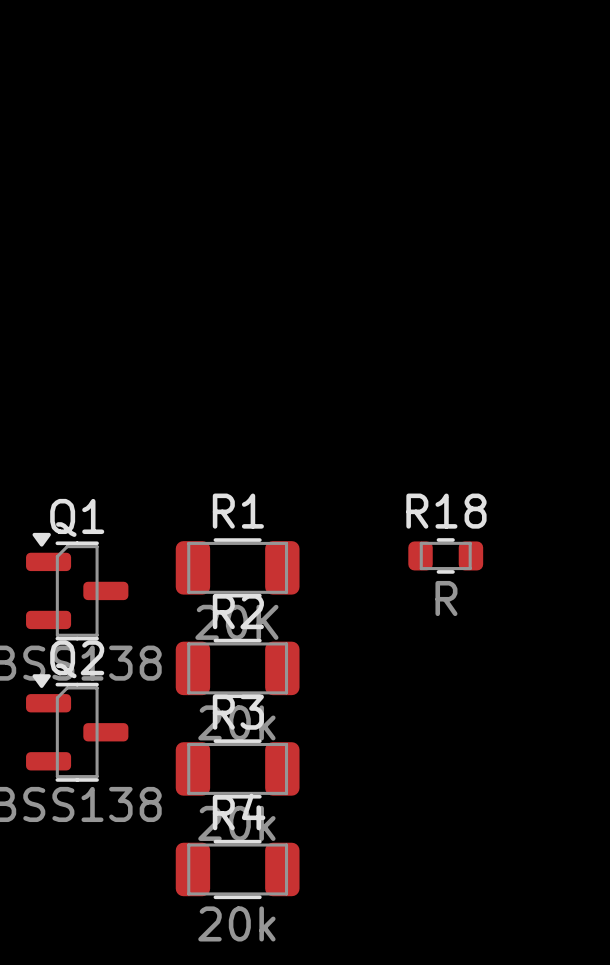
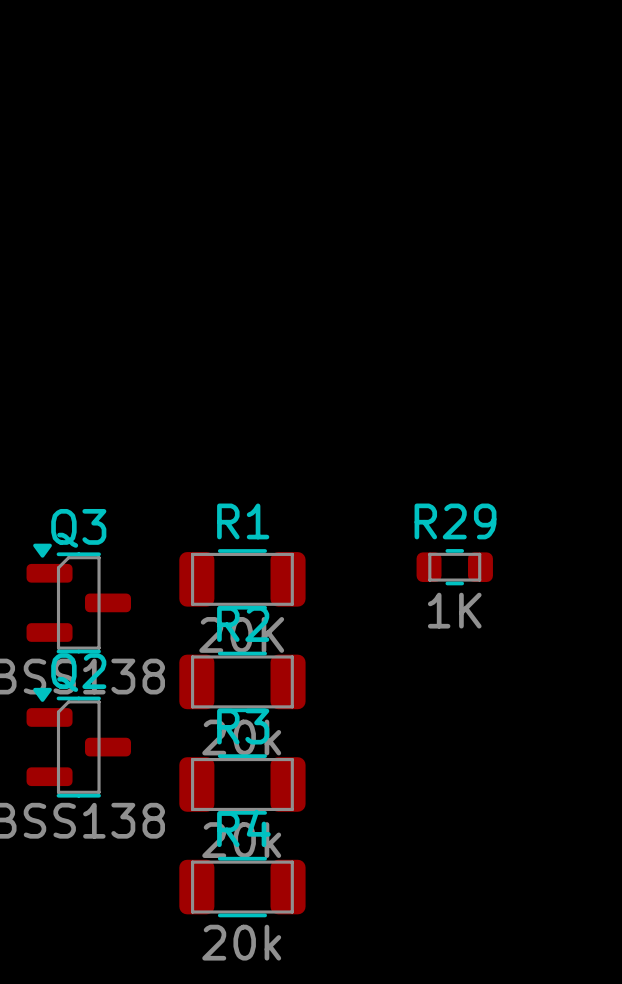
R18 name: R18 (446, 511) -> R29 (455, 521)
Q1 name: Q1 (77, 517) -> Q3 (78, 528)
R18 value: R (446, 598) -> 1K (454, 610)

